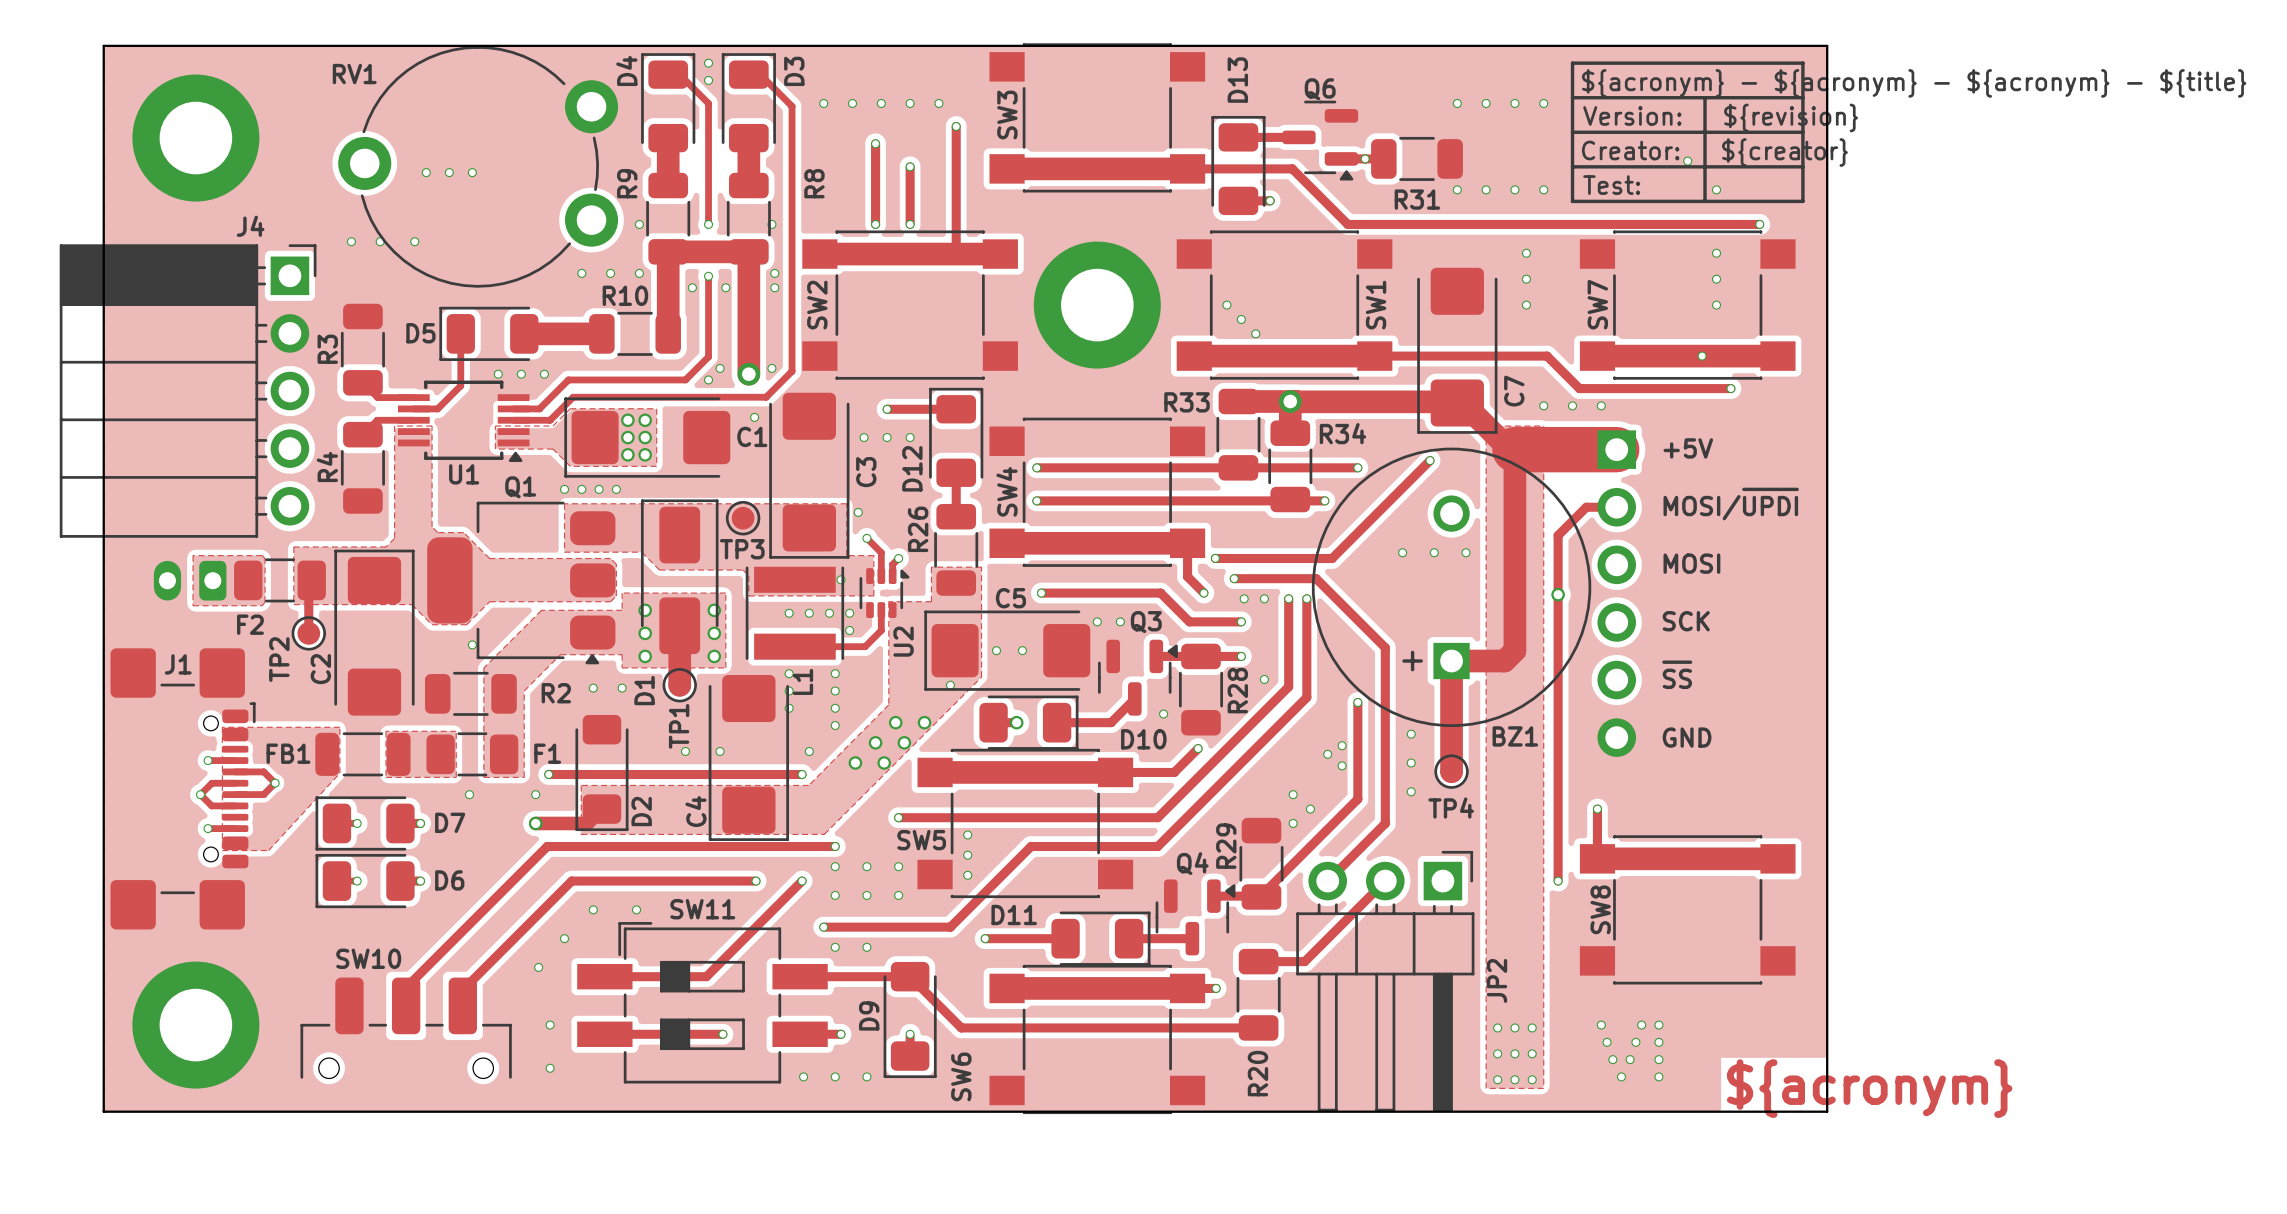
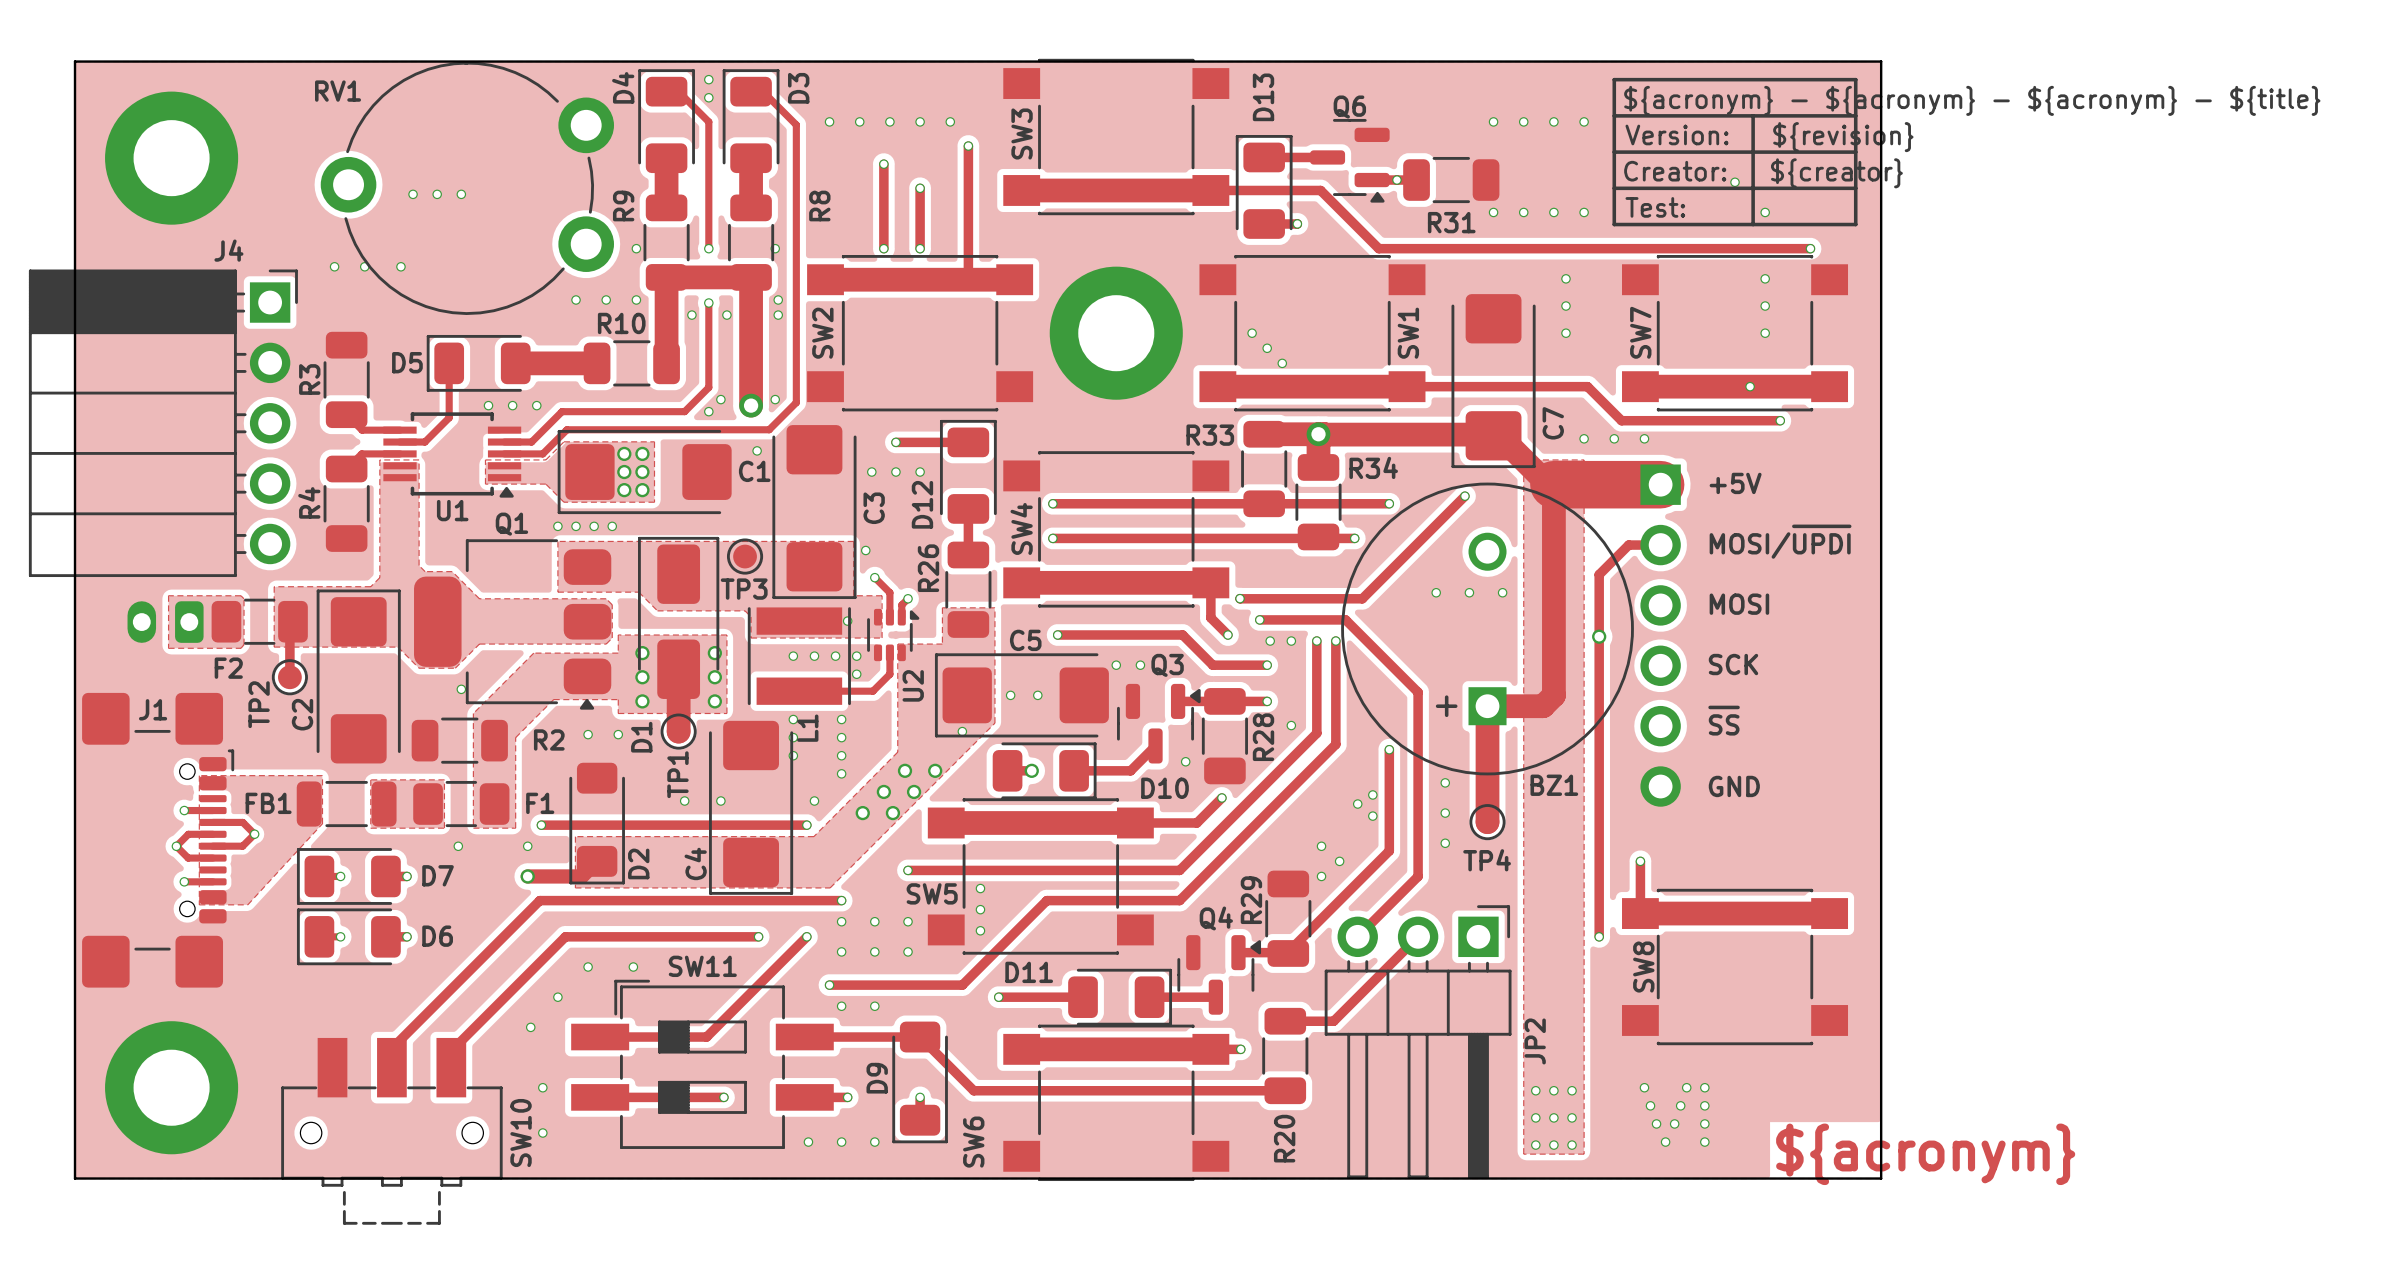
SW10 name position: SW10 (368, 958) -> SW10 (521, 1133)
SW10 footprint: [300, 977, 512, 1079] -> [281, 1037, 503, 1225]

